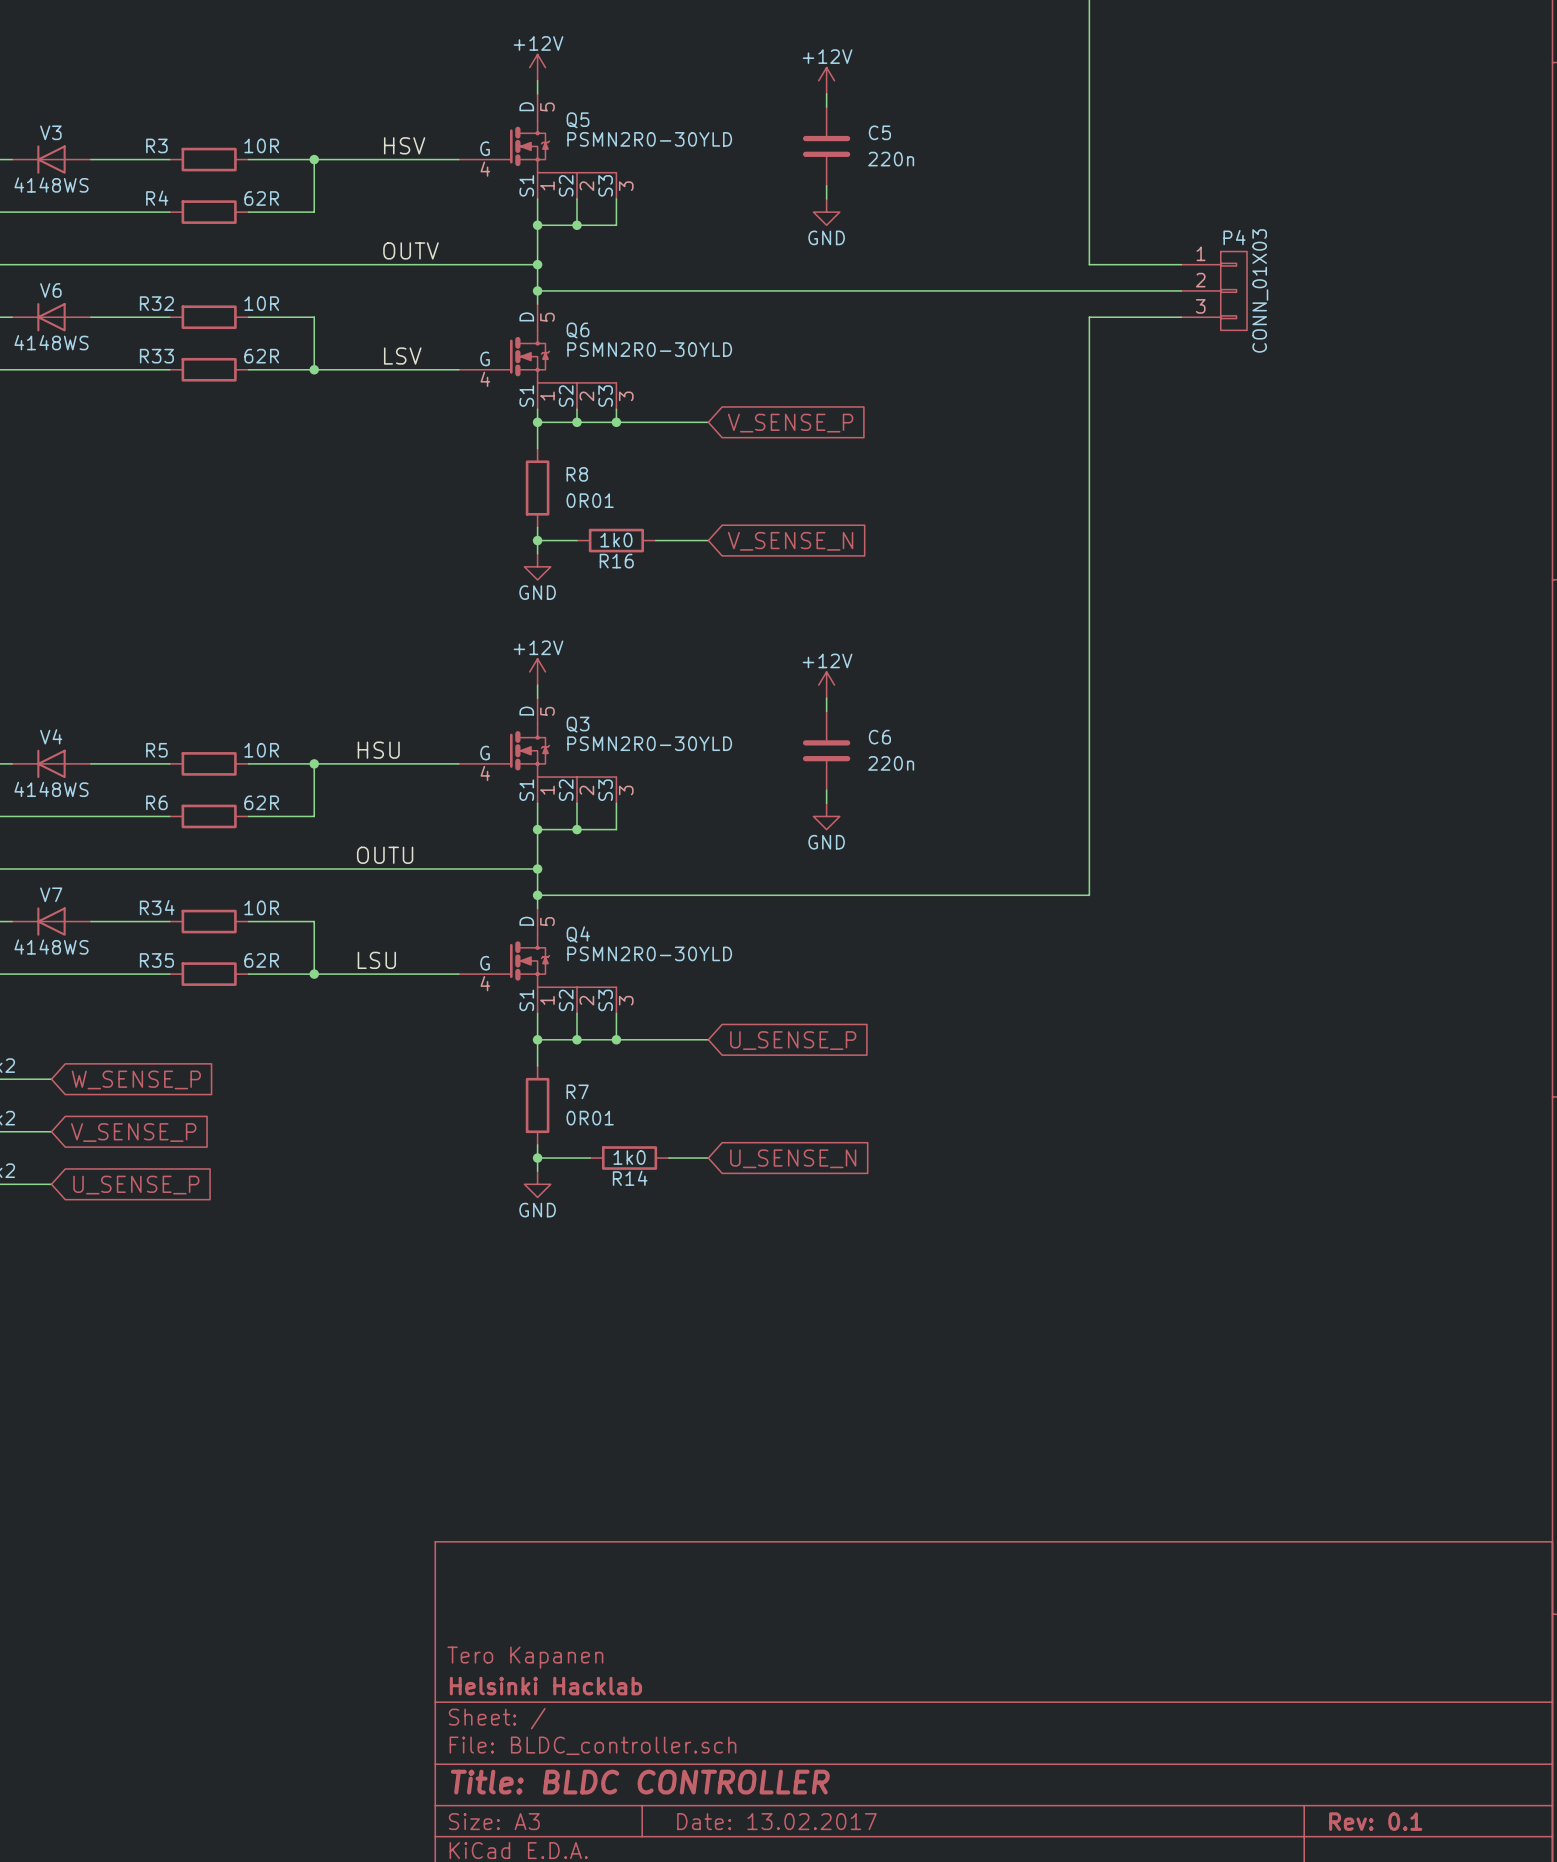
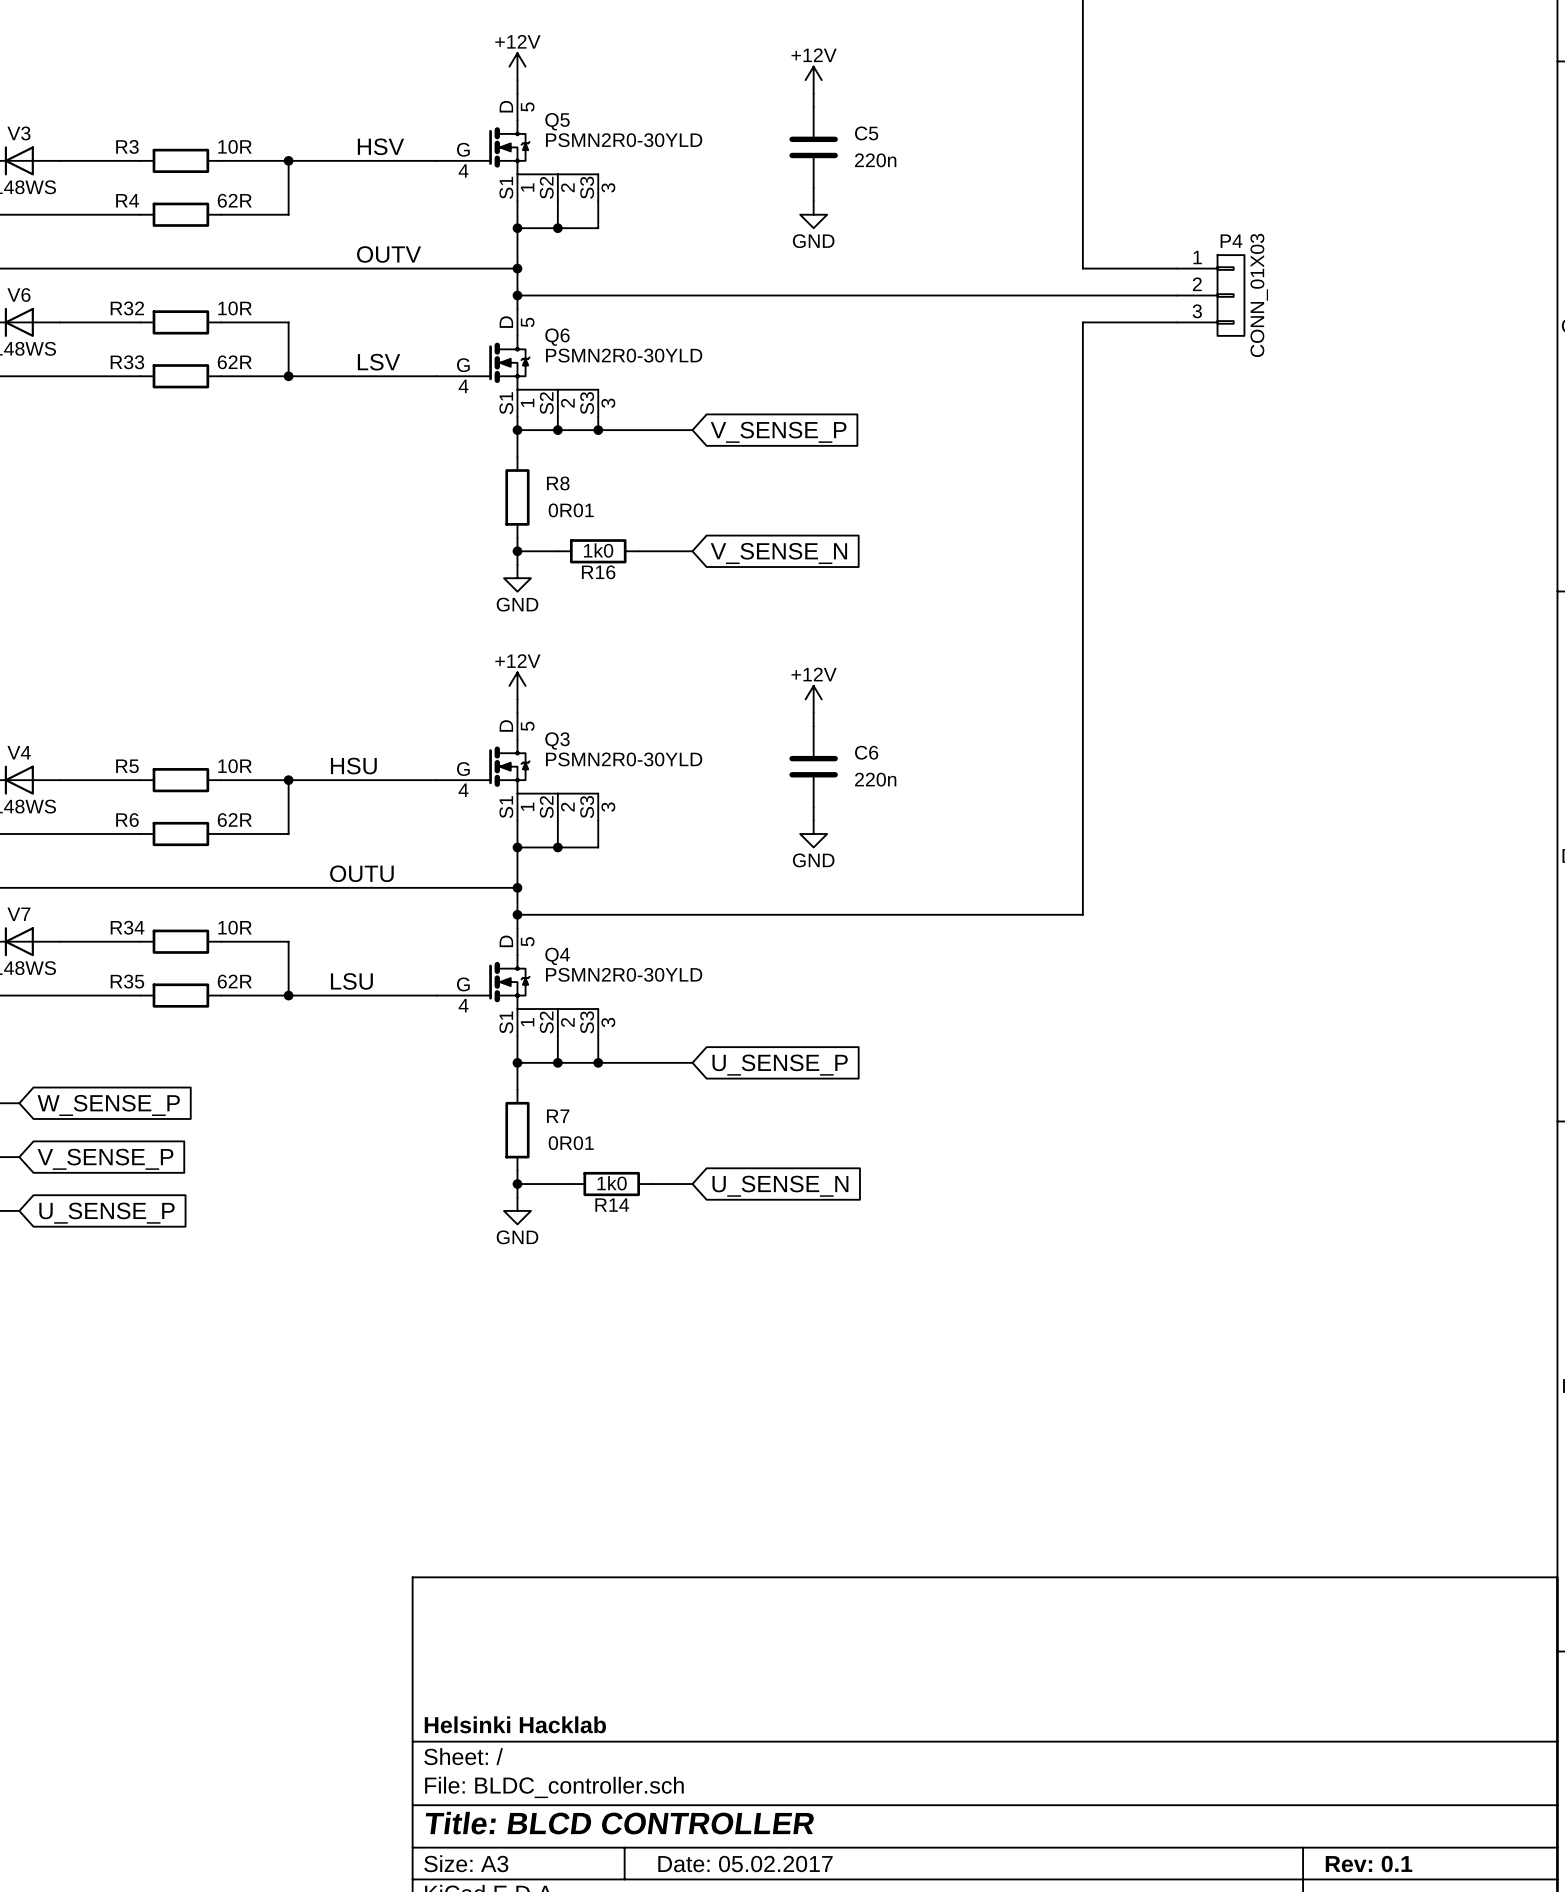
title block: Tero Kapanen (525, 1657) -> none
title block: Title: BLDC CONTROLLER (640, 1782) -> Title: BLCD CONTROLLER (619, 1823)
title block: Date: 13.02.2017 (776, 1821) -> Date: 05.02.2017 (745, 1864)

